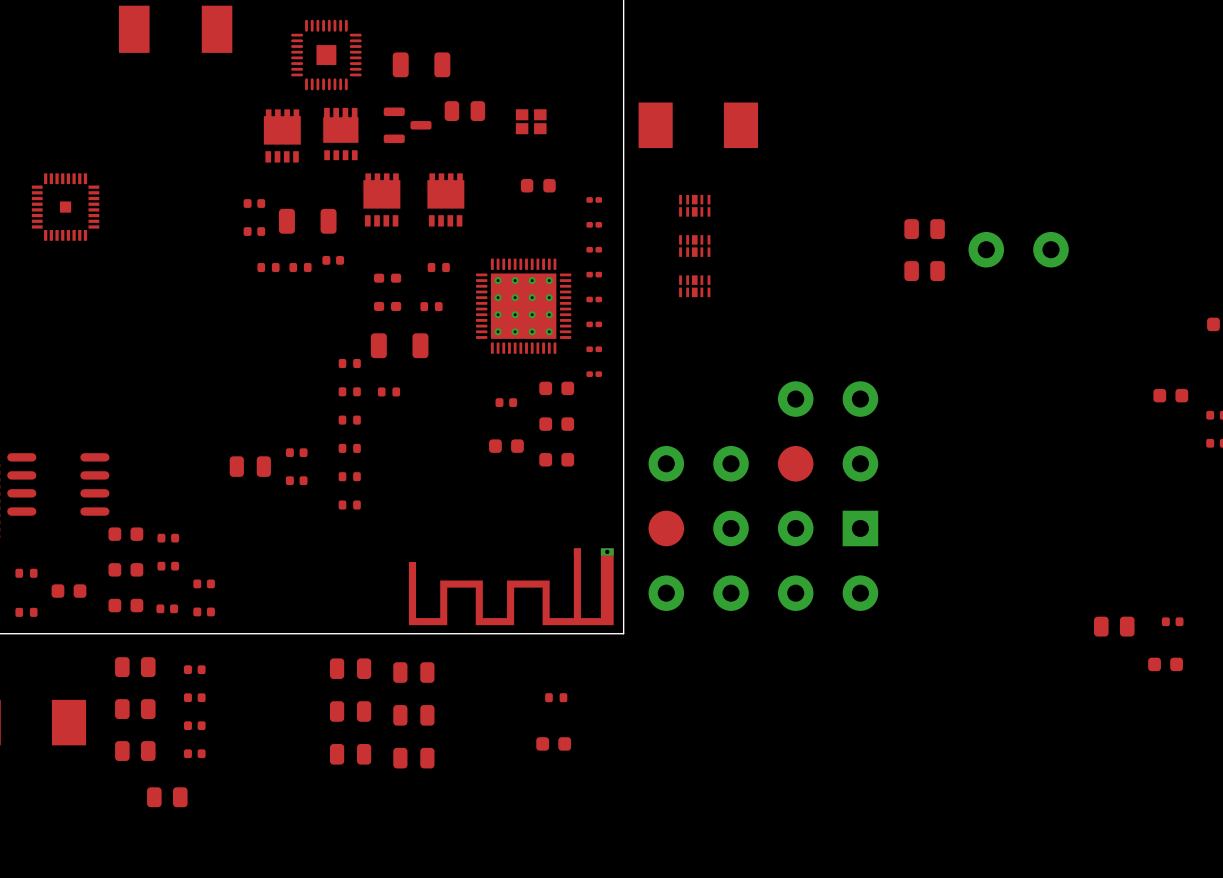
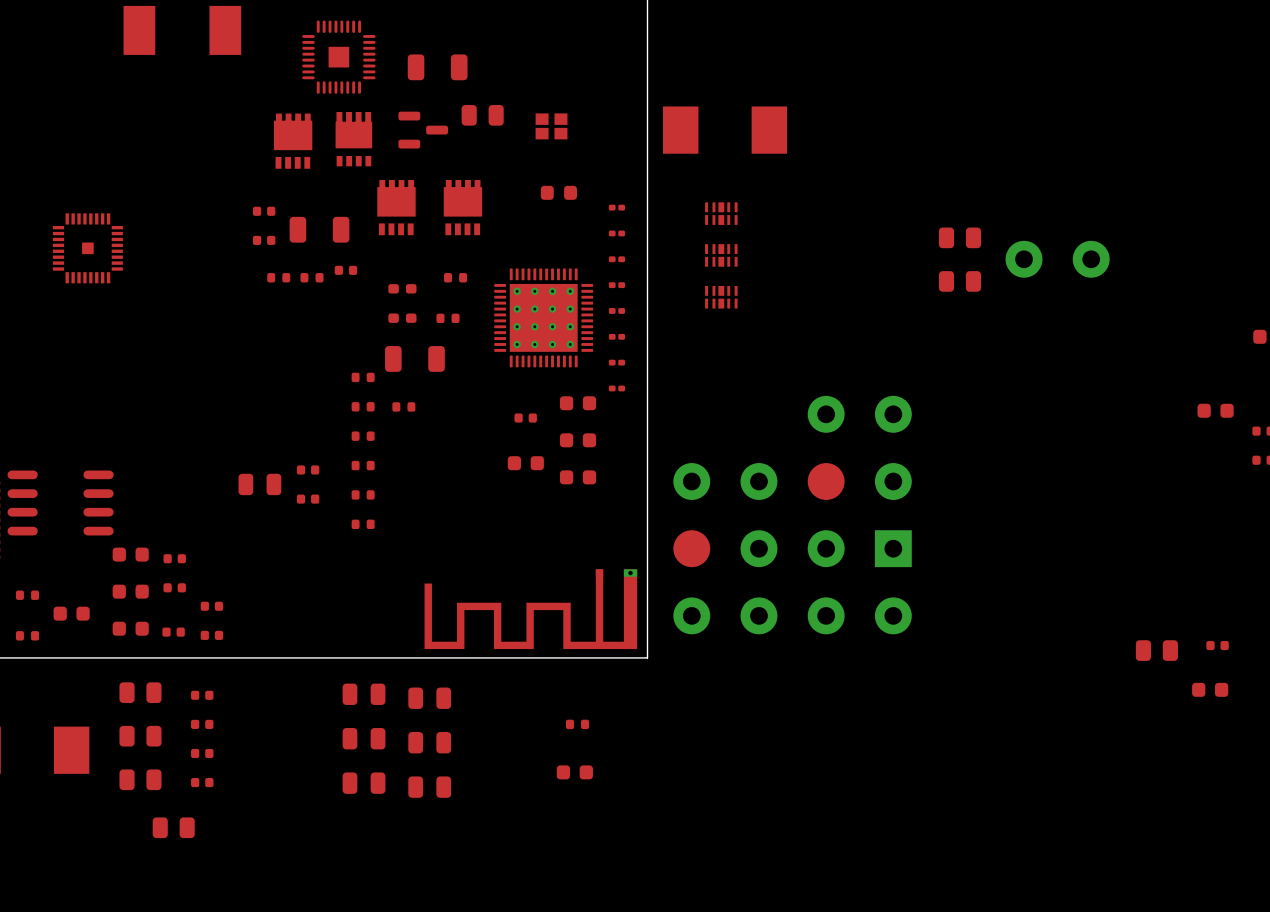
part position: (65, 207) -> (87, 248)

